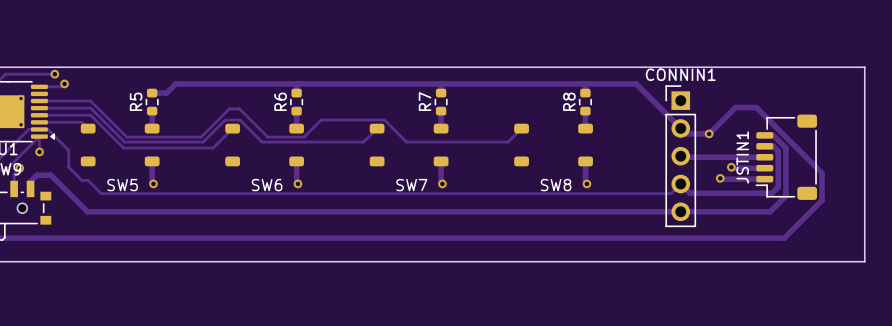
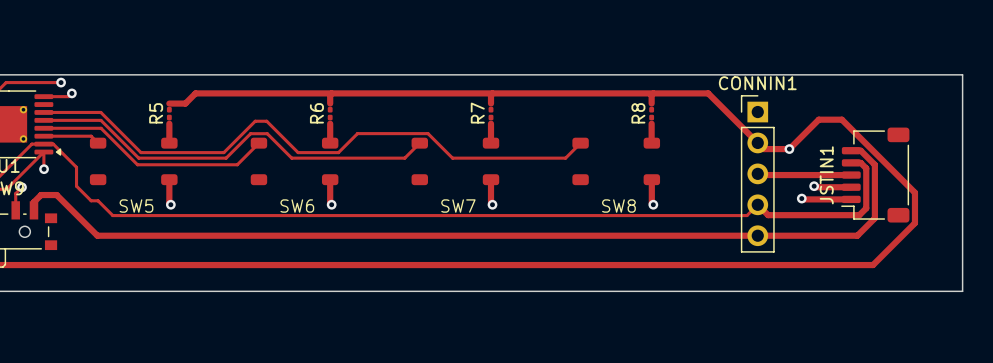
R5 footprint: [145, 88, 159, 116] -> [166, 106, 172, 121]
R6 footprint: [290, 88, 304, 116] -> [327, 106, 333, 121]
R7 footprint: [434, 88, 448, 116] -> [488, 106, 494, 121]
R8 footprint: [579, 88, 592, 116] -> [649, 106, 655, 121]

